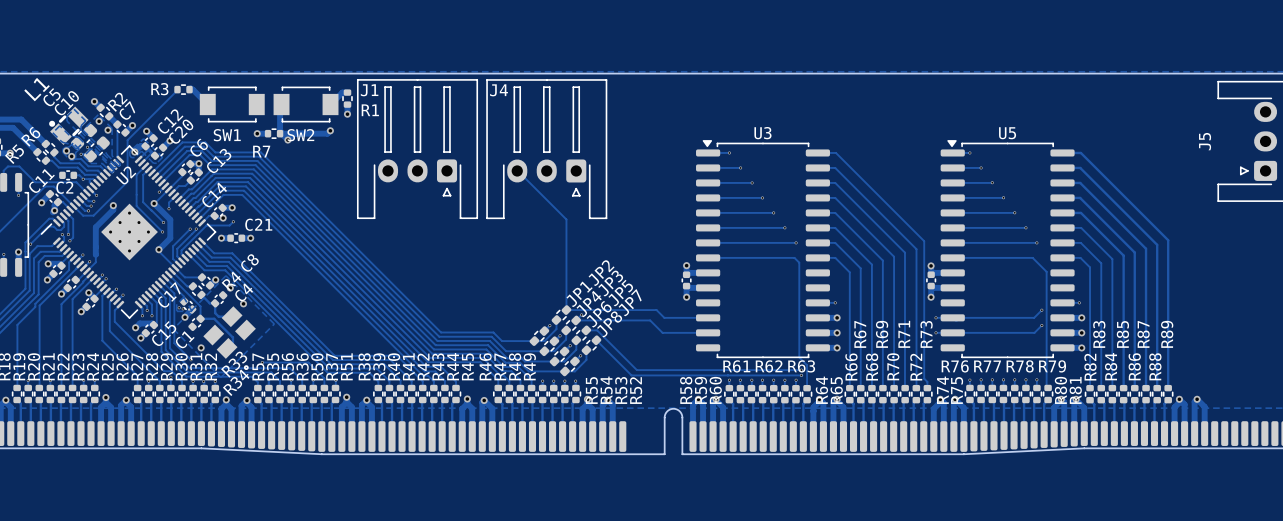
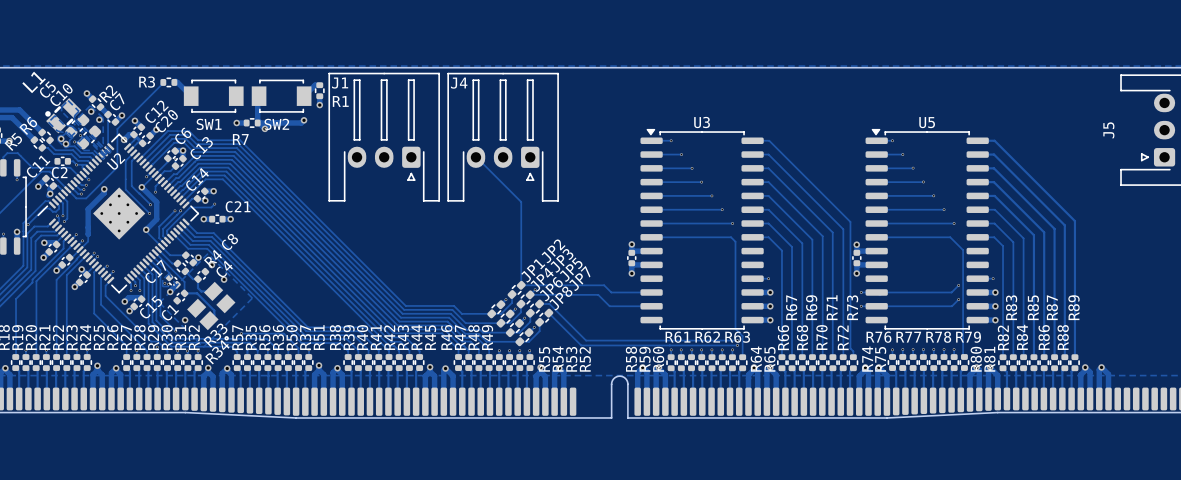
zone outline: (143, 138) (129, 151) (129, 155) (134, 157) (141, 151) (153, 163) (156, 163) (162, 157) (143, 138) -> none

